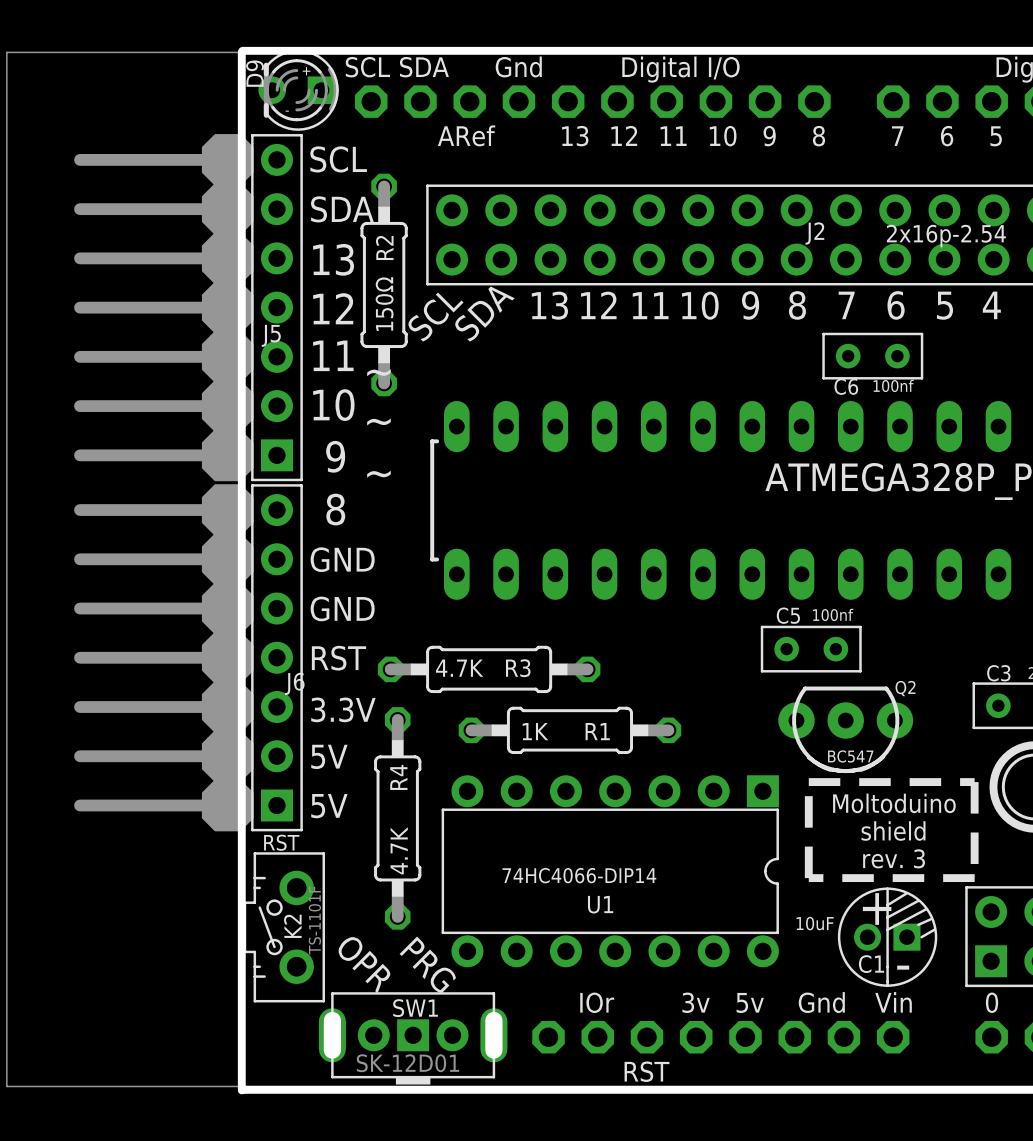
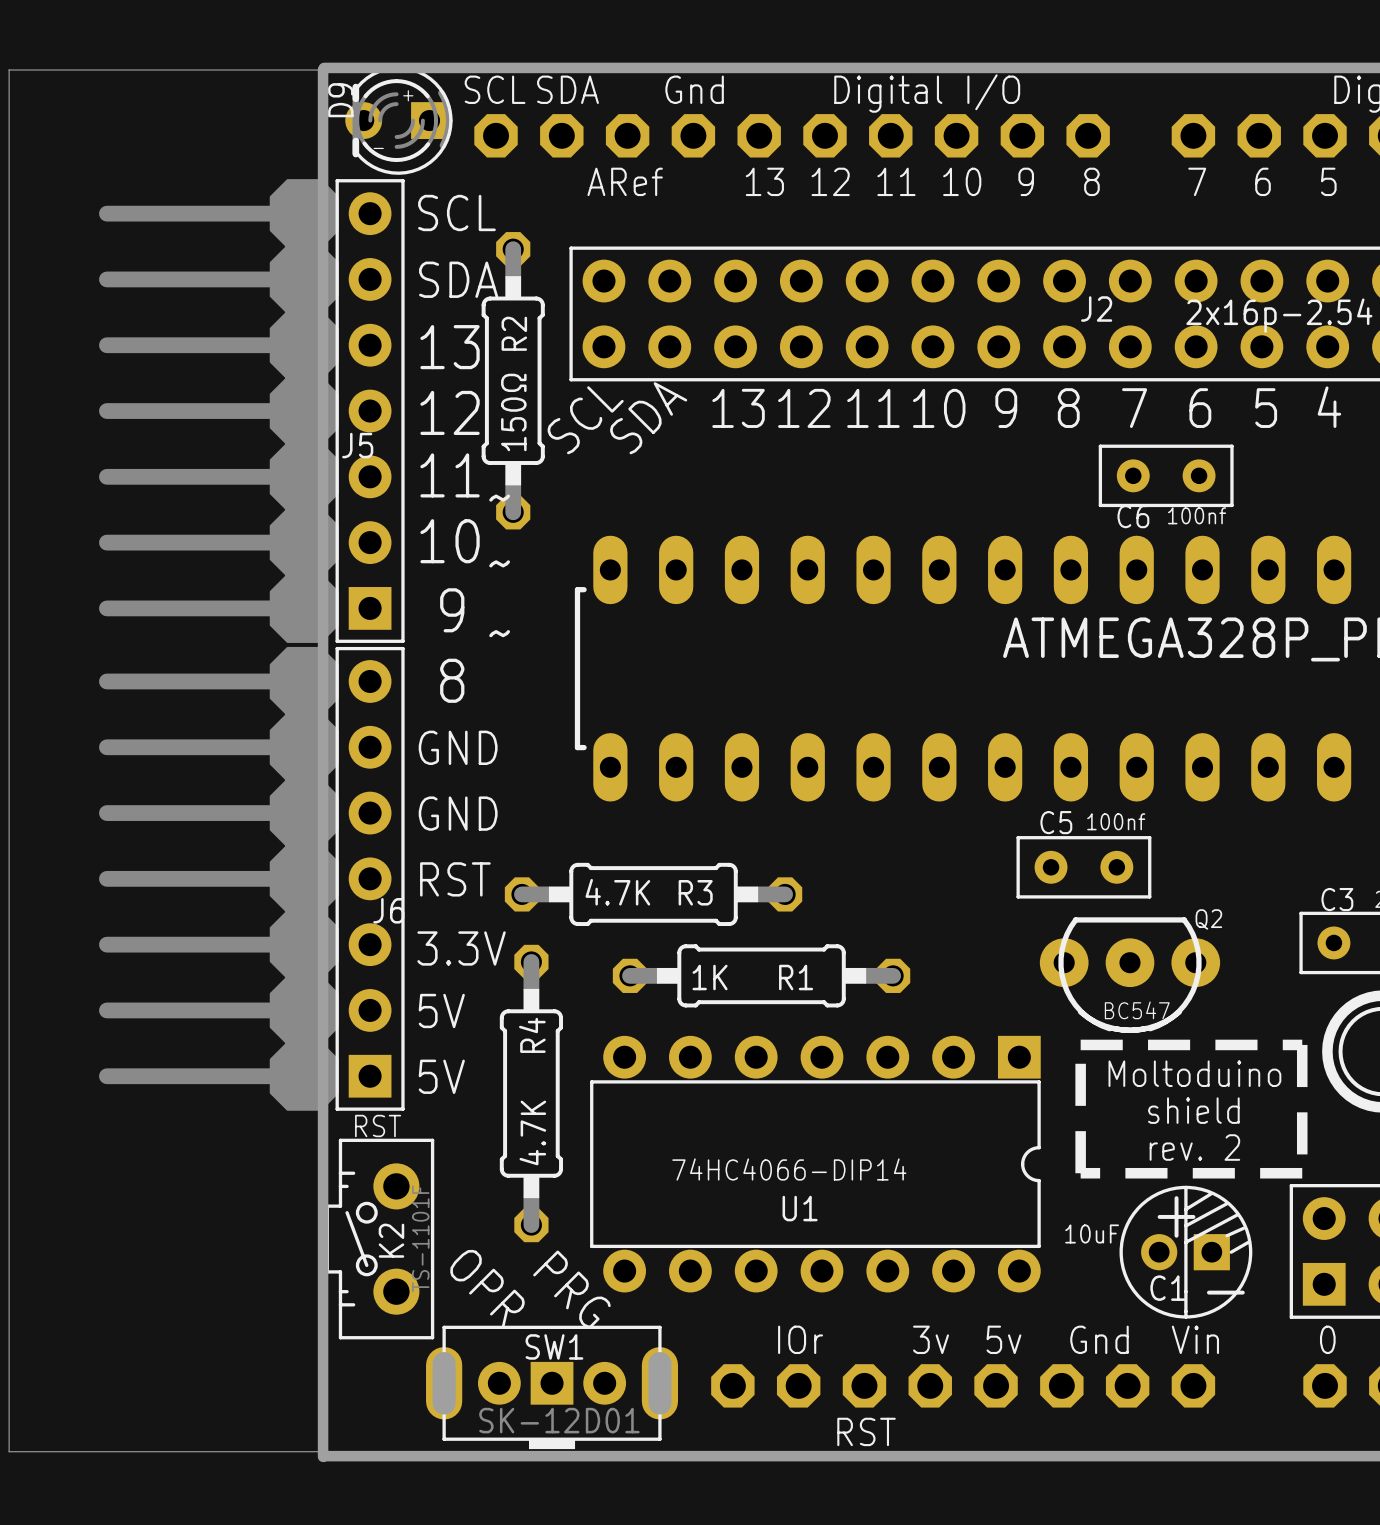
text: rev. 3 (894, 858) -> rev. 2 (1194, 1147)

